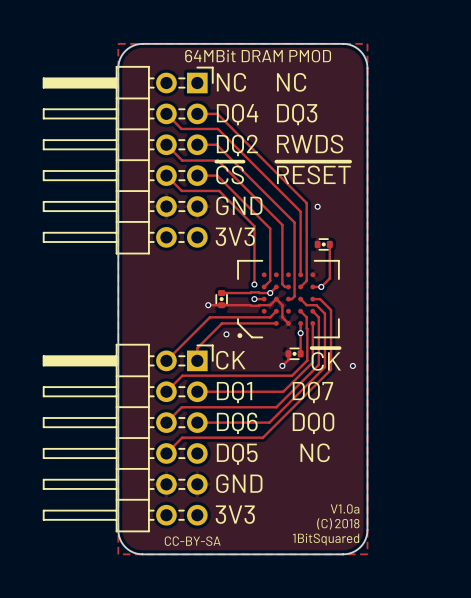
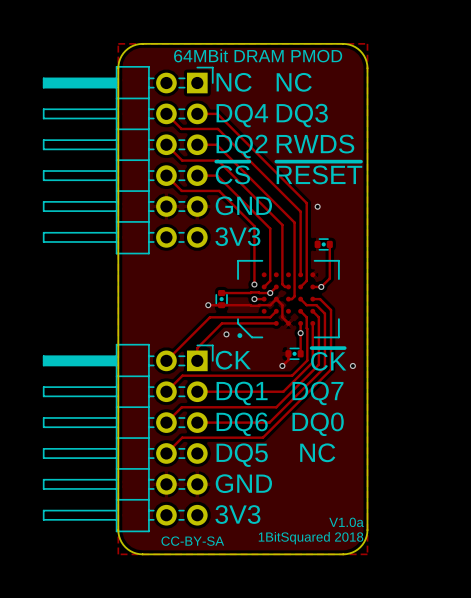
text: V1.0a (345, 508) -> none
text: (C) 2018 (338, 523) -> V1.0a (346, 522)
text: 1BitSquared (326, 539) -> 1BitSquared 2018 (311, 538)

